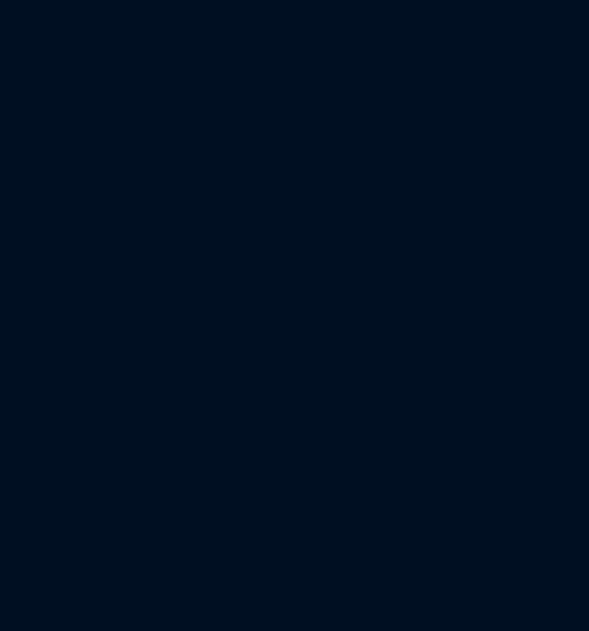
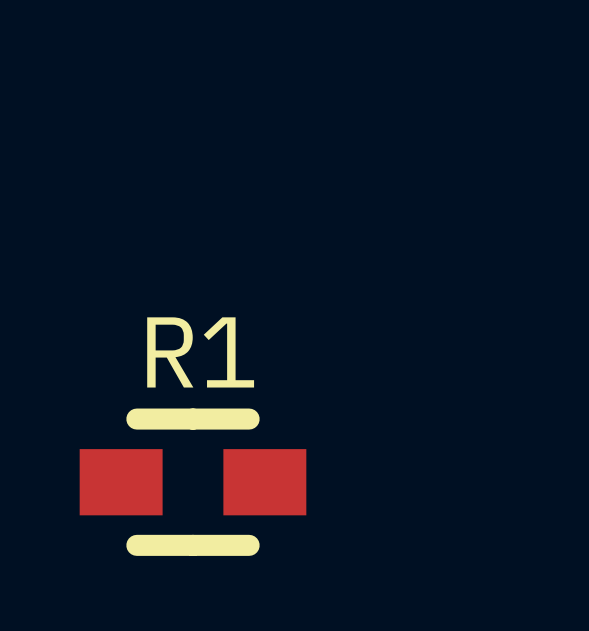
R1: none -> (193, 482)

